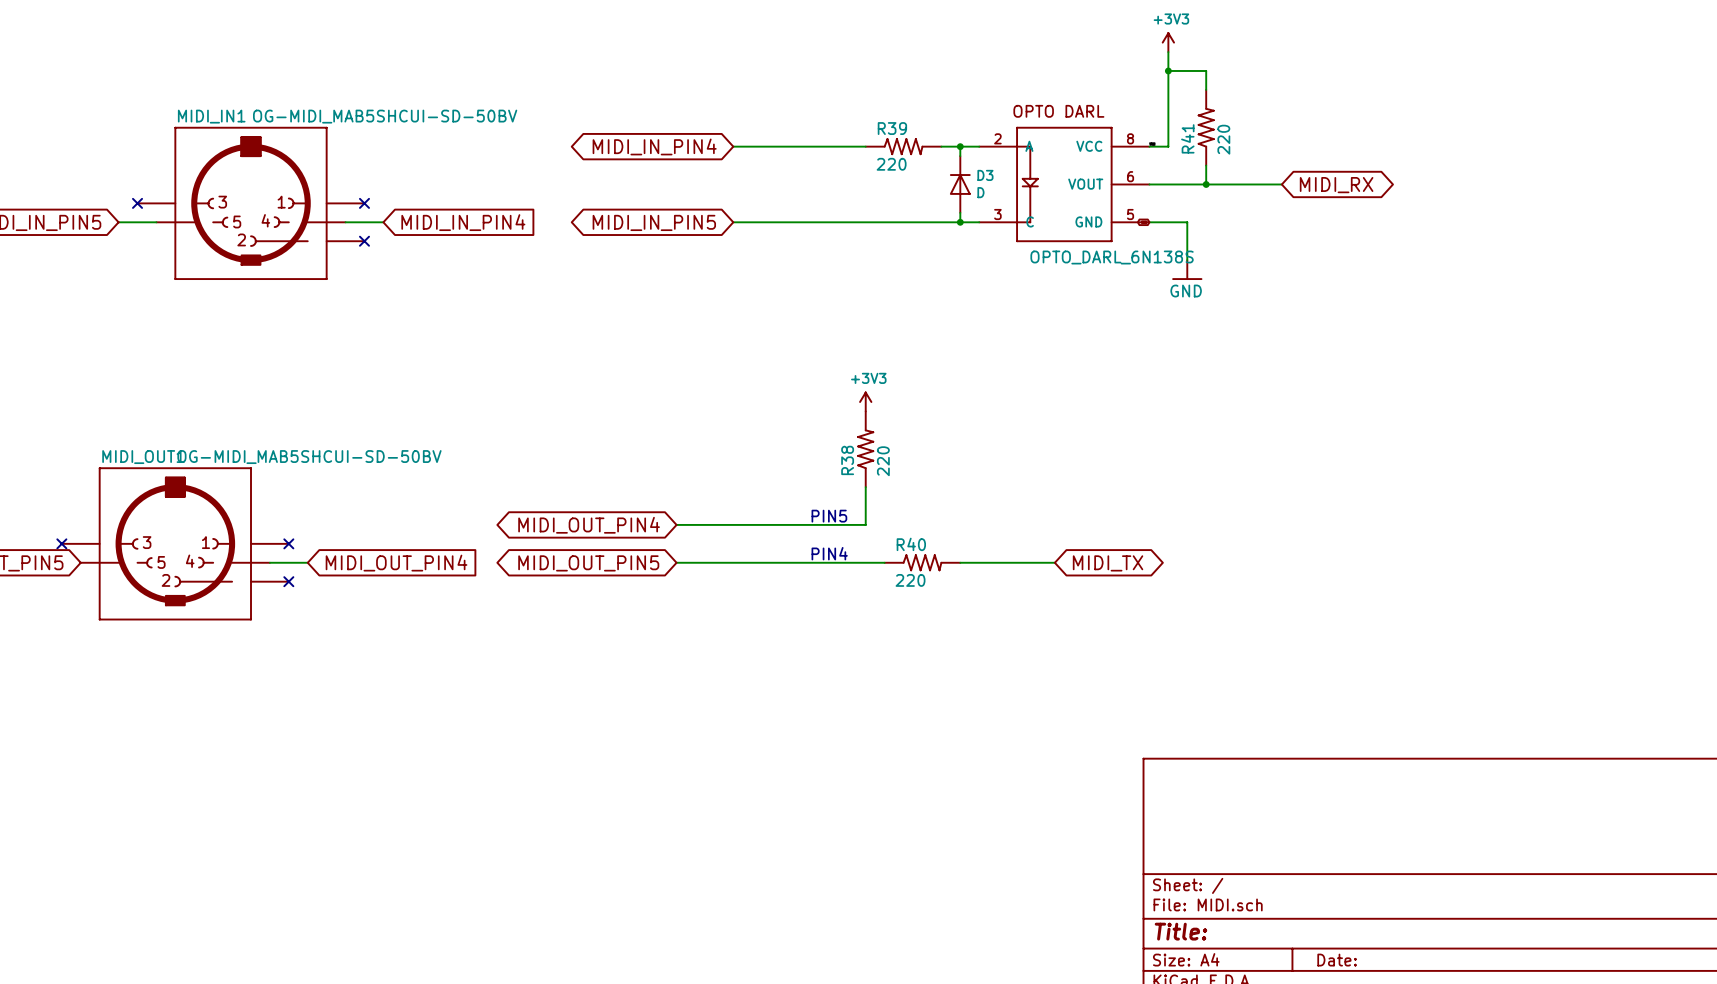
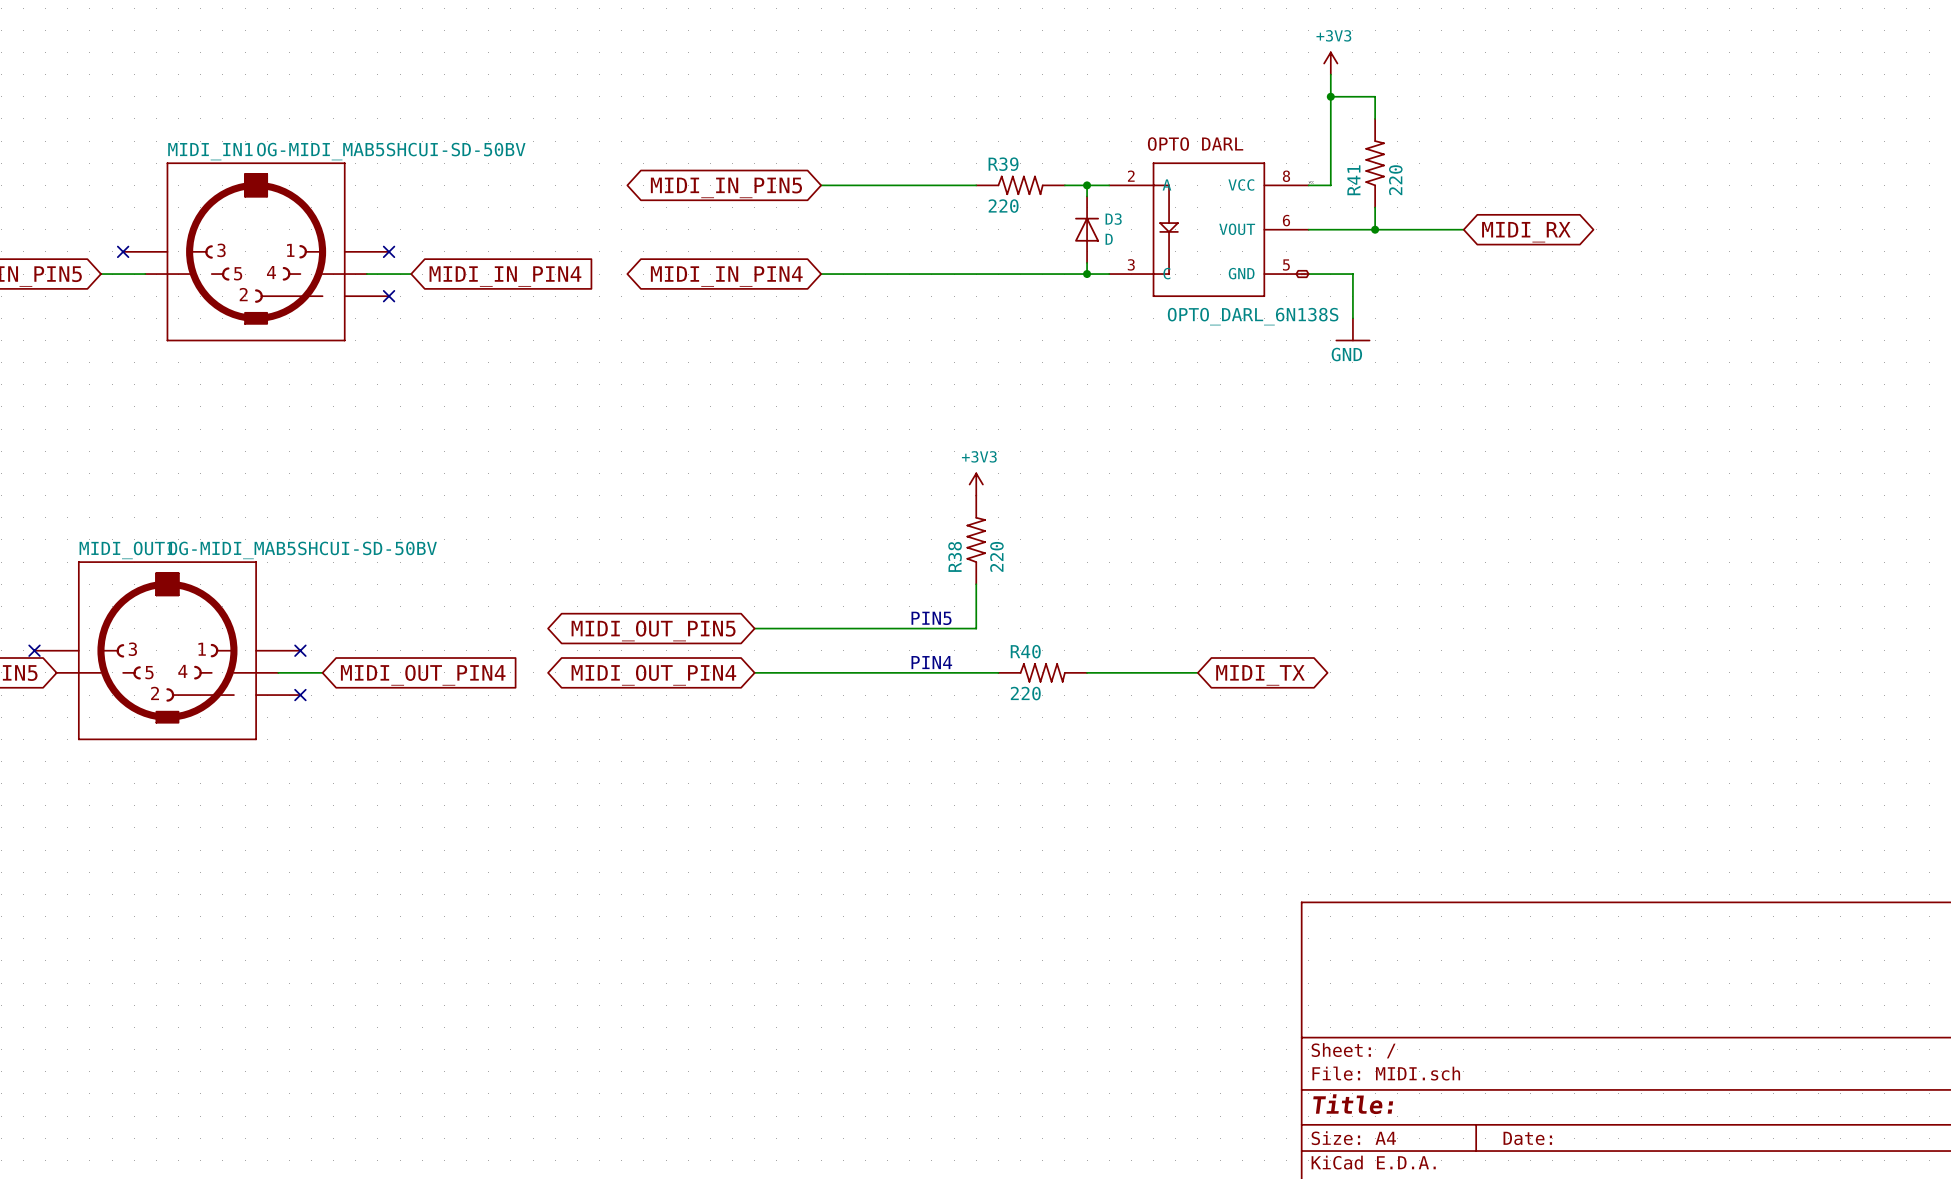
global label: MIDI_IN_PIN4 (654, 146) -> MIDI_IN_PIN5 (726, 187)
global label: MIDI_IN_PIN5 (654, 222) -> MIDI_IN_PIN4 (726, 276)
global label: MIDI_OUT_PIN4 (589, 525) -> MIDI_OUT_PIN5 (653, 630)
global label: MIDI_OUT_PIN5 (588, 563) -> MIDI_OUT_PIN4 (653, 675)

